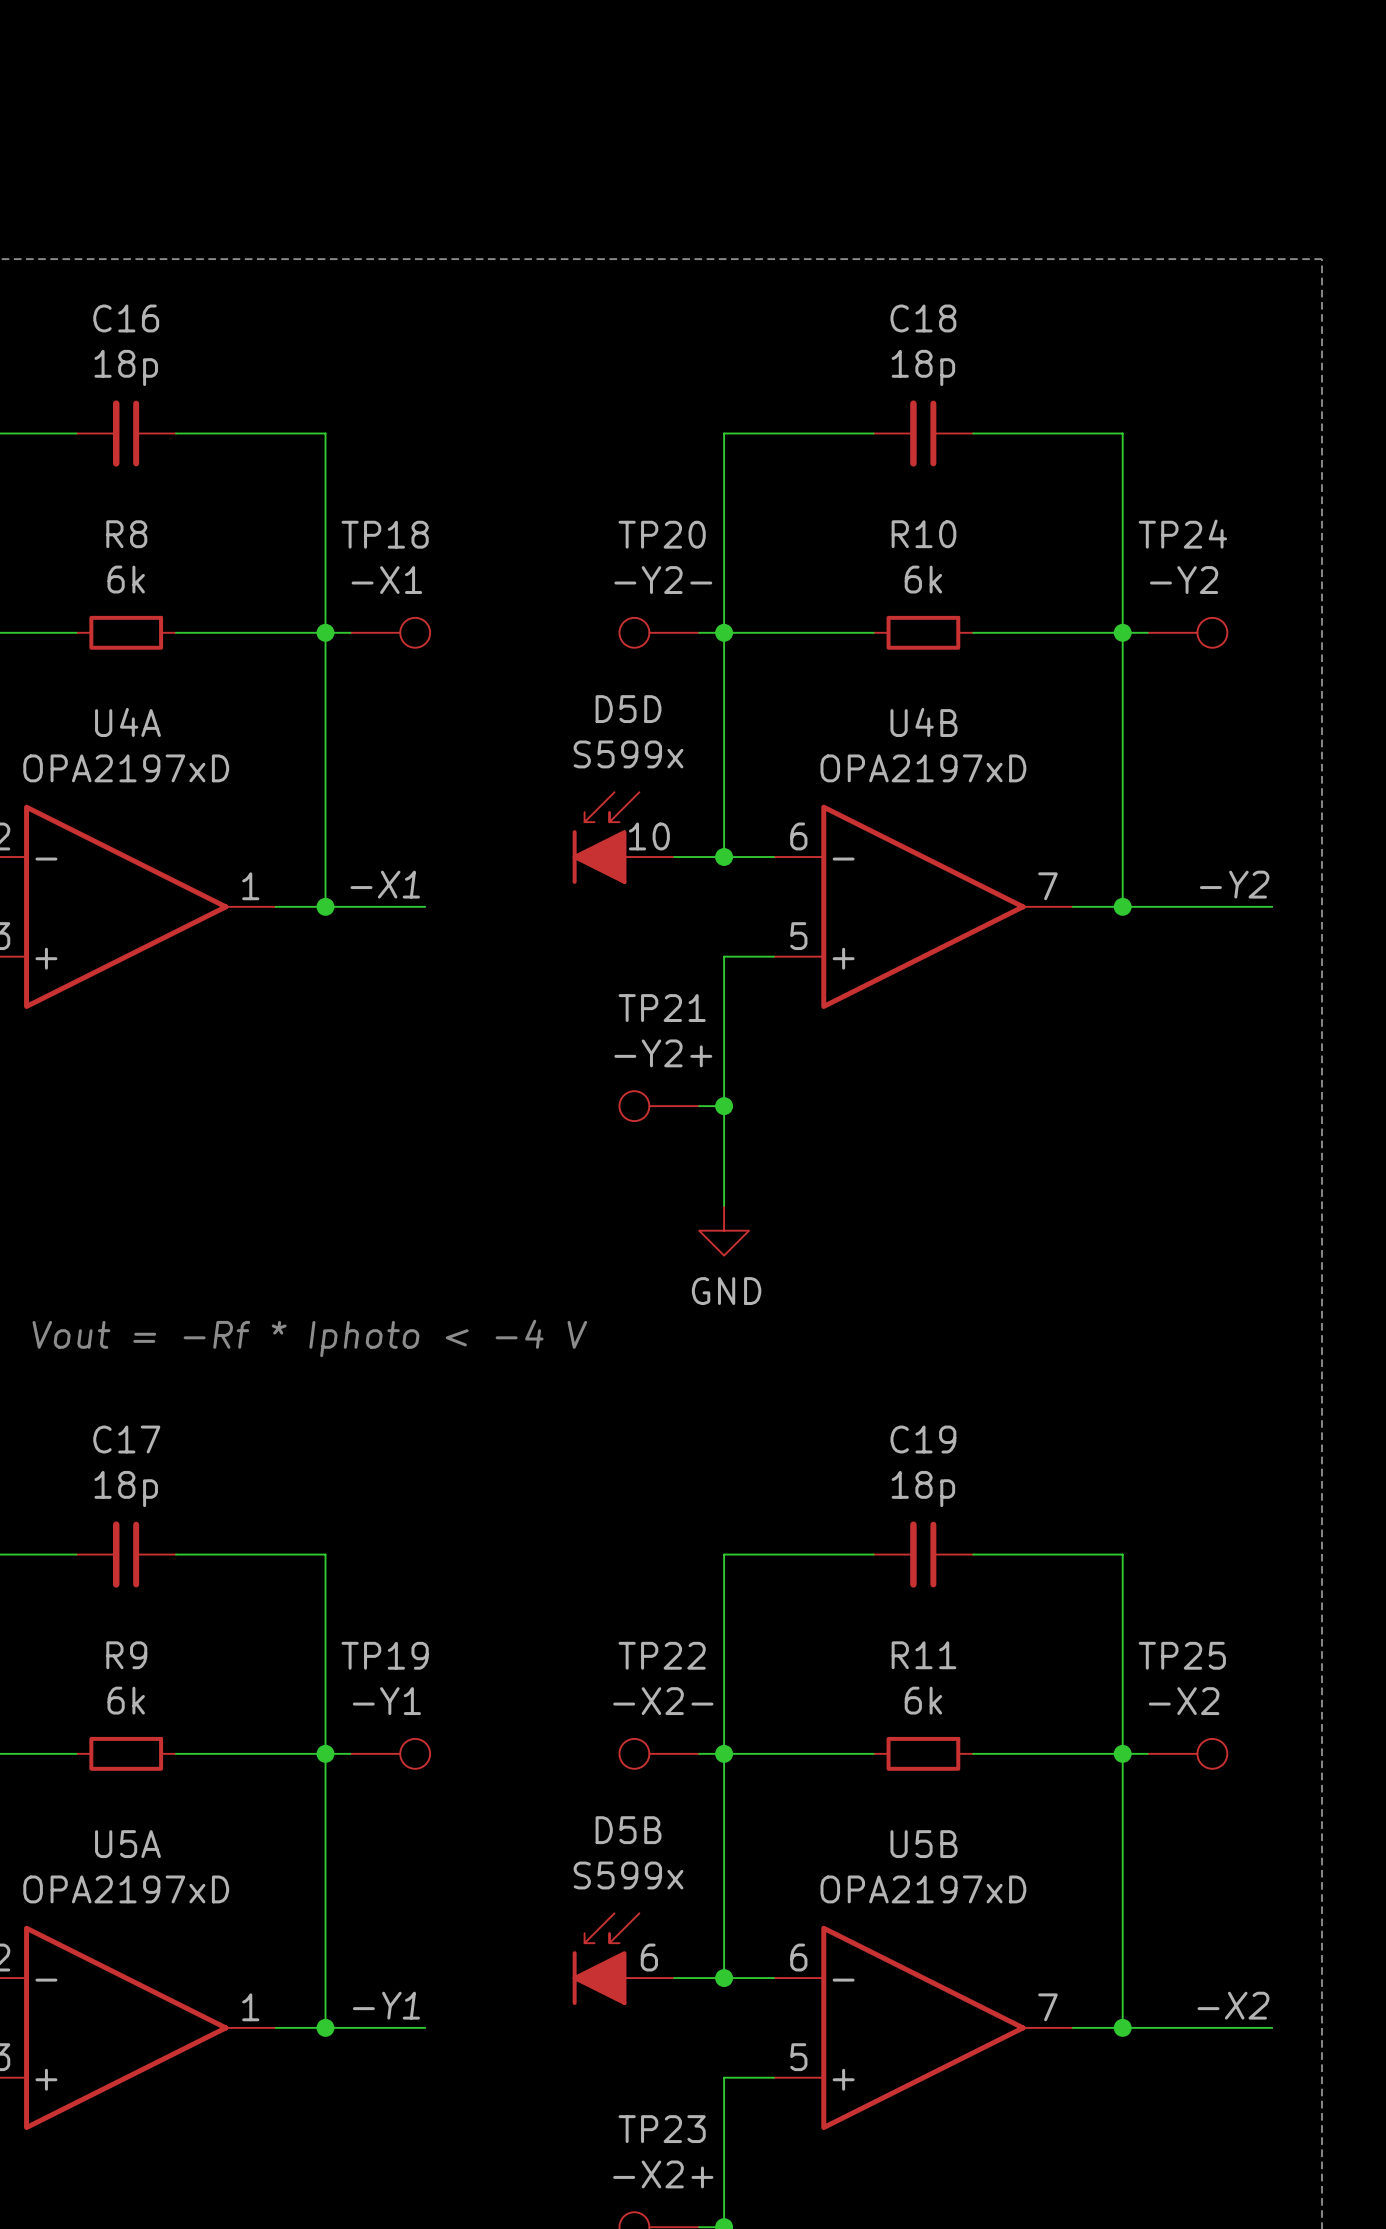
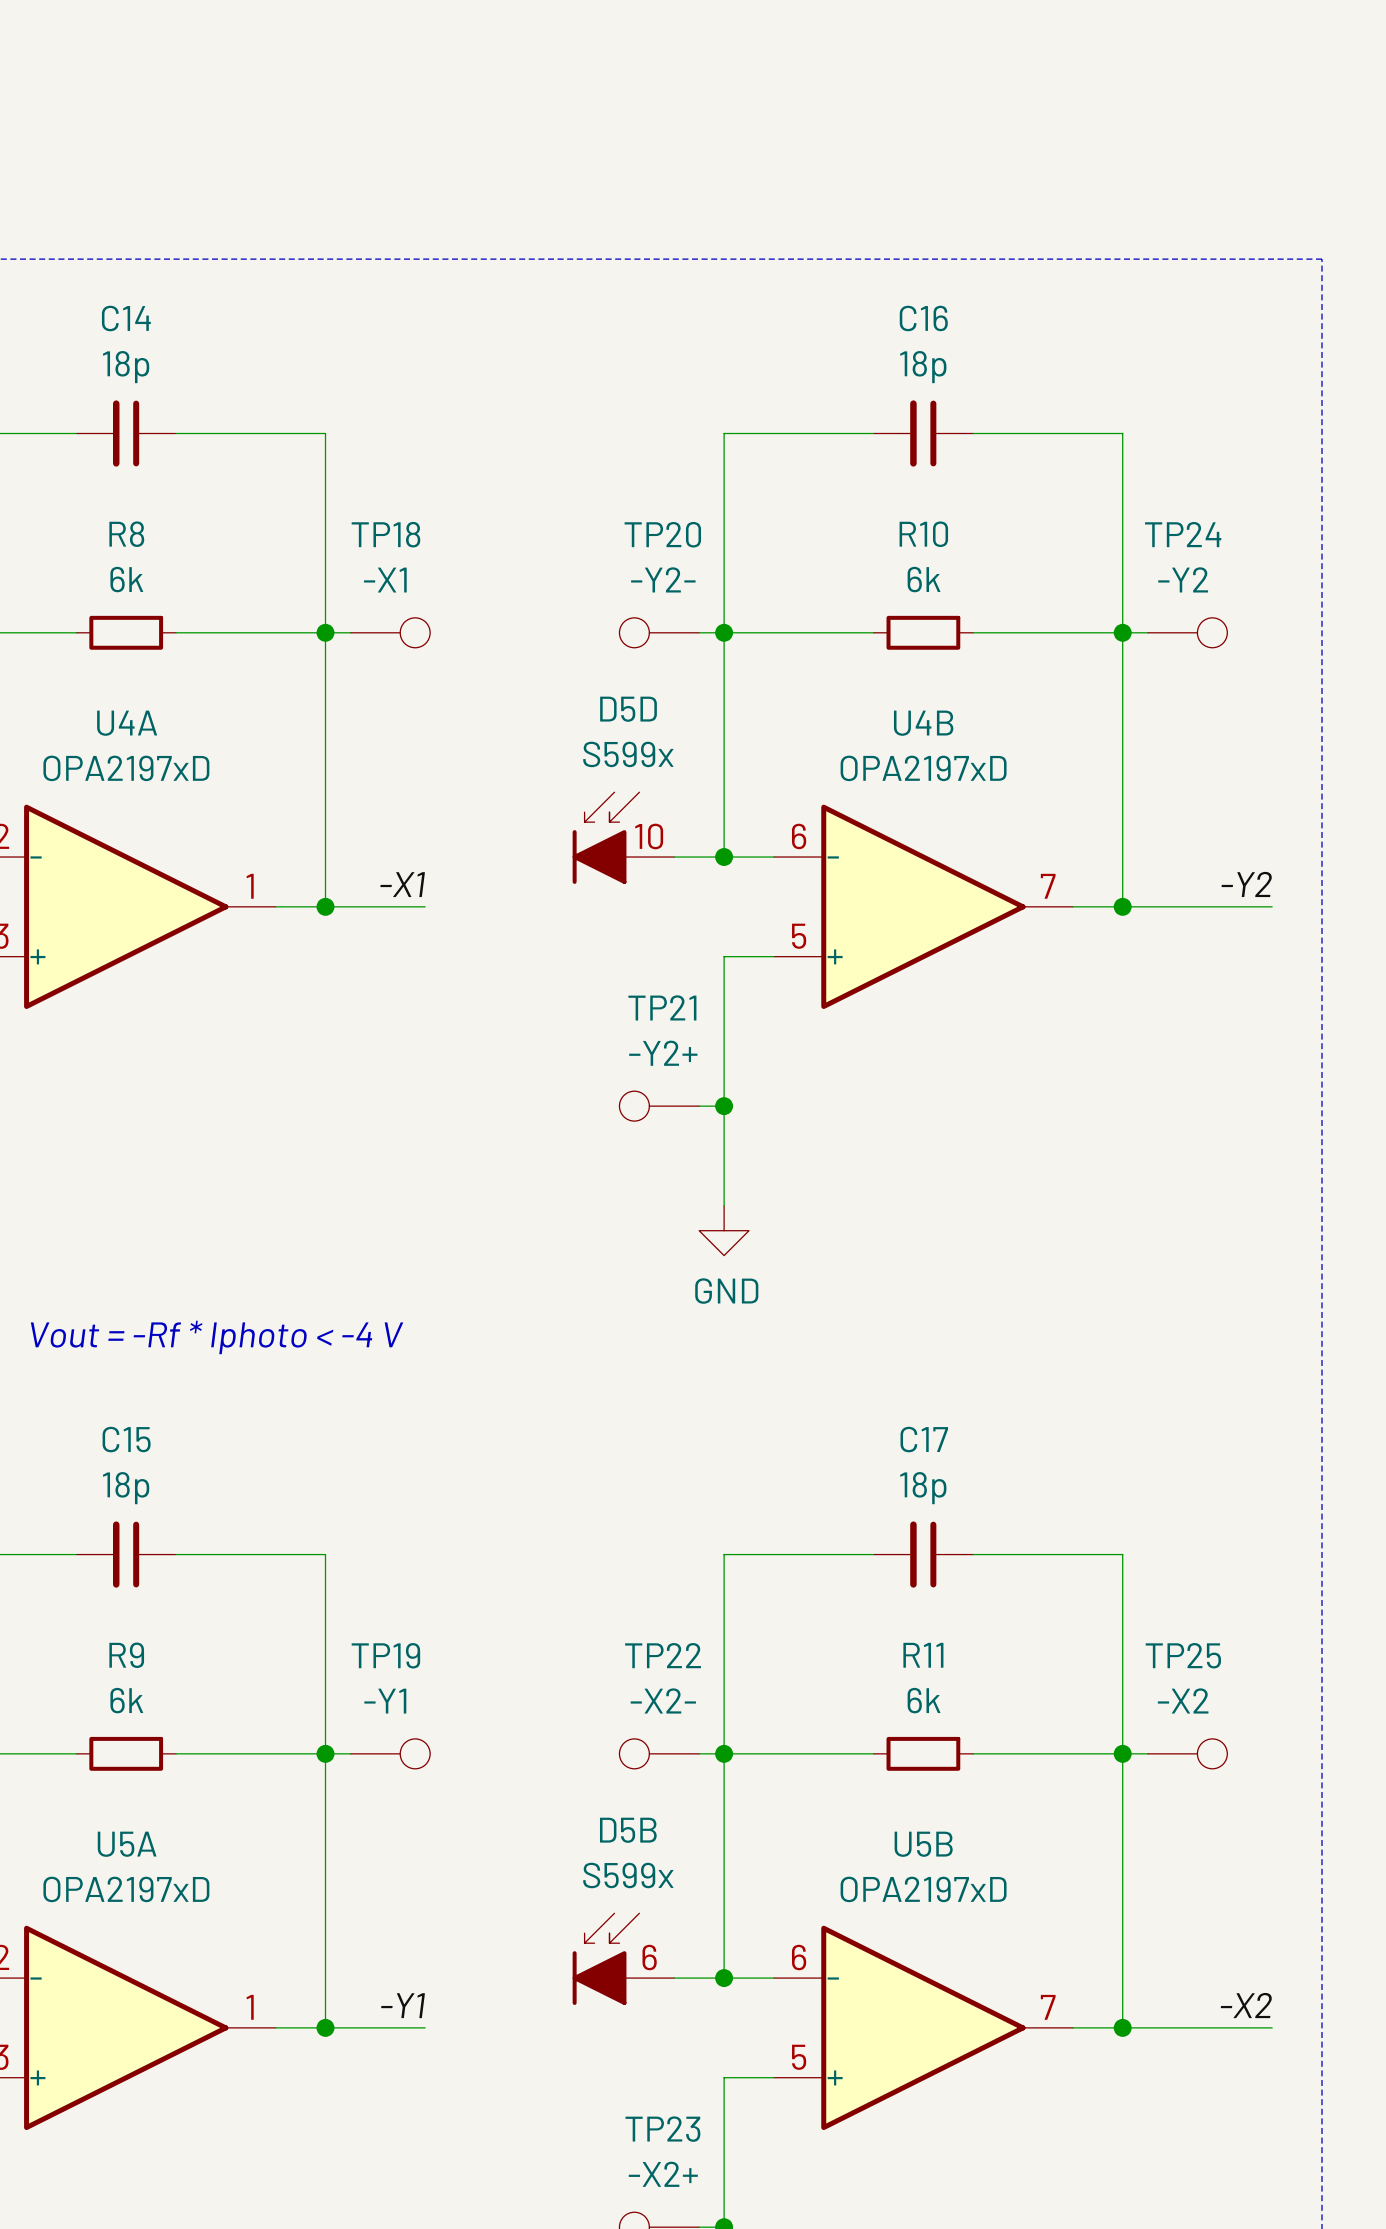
C16 name: C16 (126, 318) -> C14 (126, 318)
C18 name: C18 (923, 318) -> C16 (923, 318)
C17 name: C17 (126, 1439) -> C15 (126, 1439)
C19 name: C19 (923, 1439) -> C17 (924, 1439)

